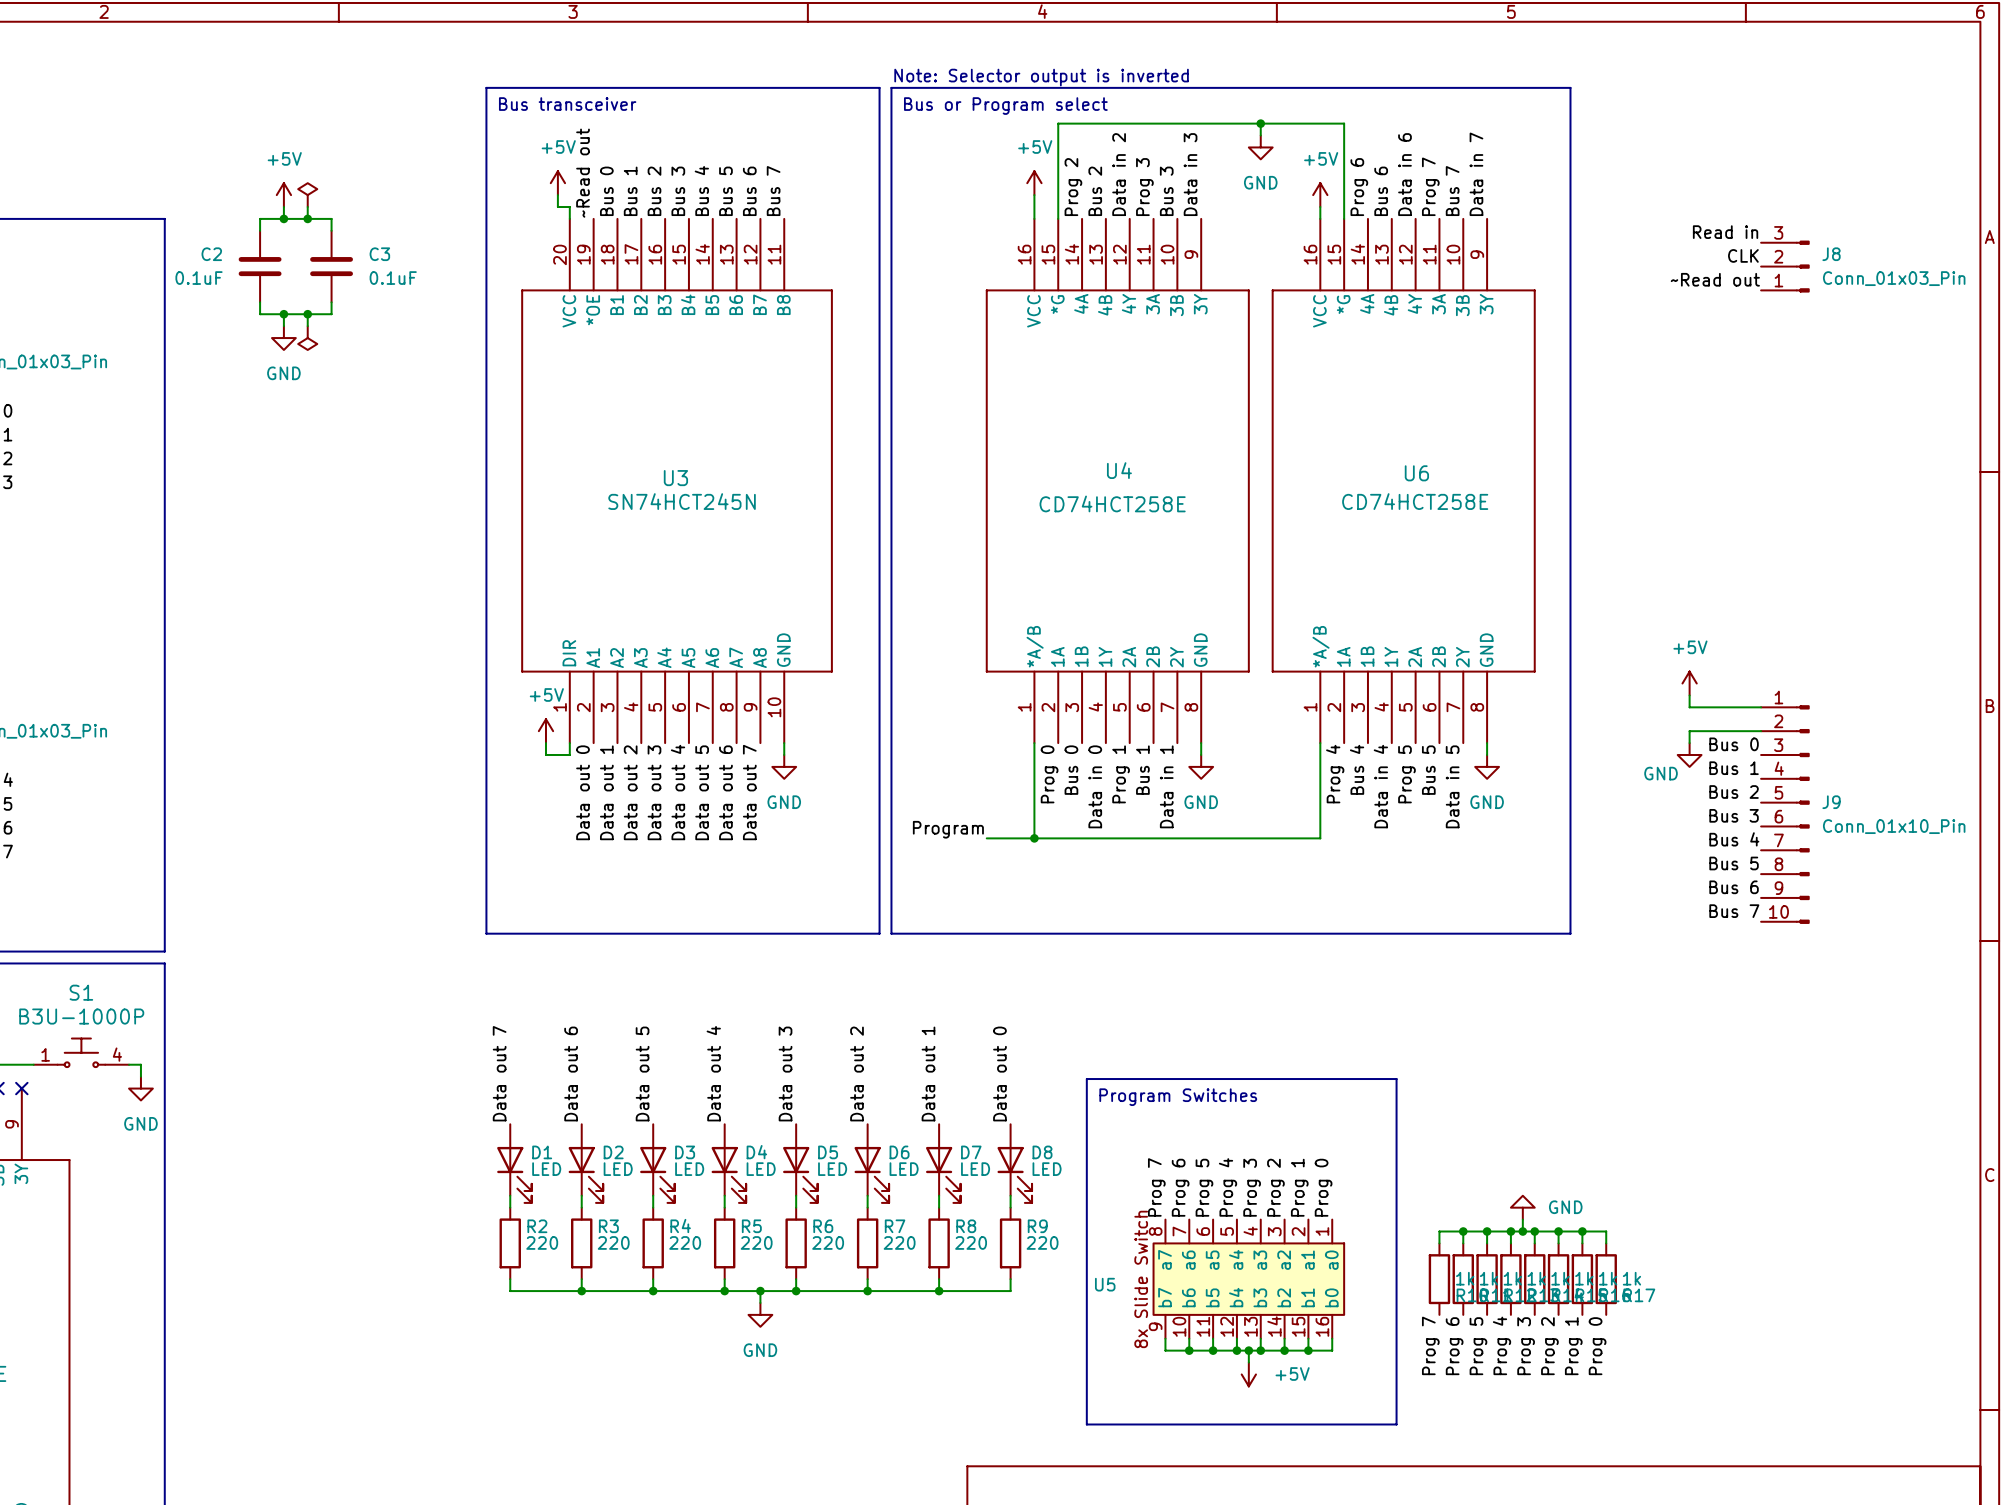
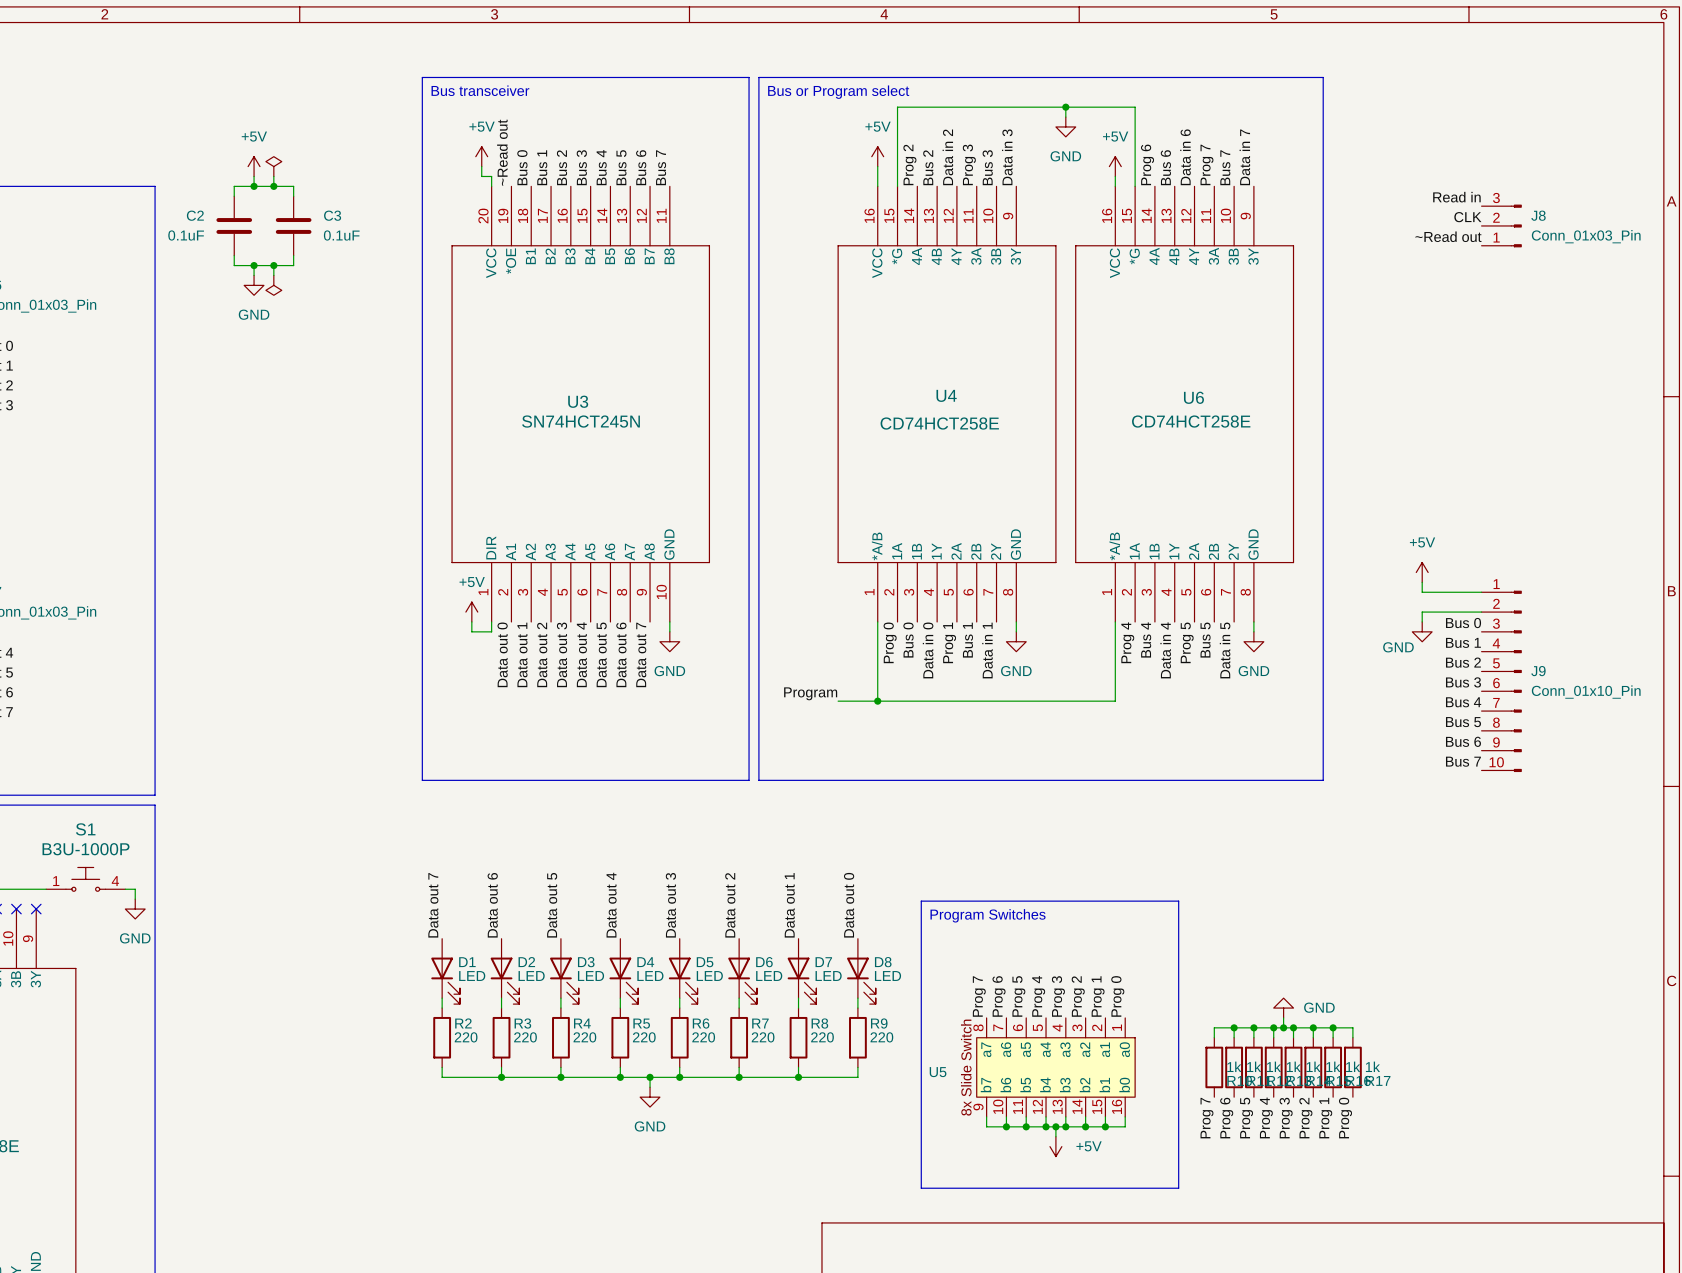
text: Note: Selector output is inverted (1041, 77) -> none

